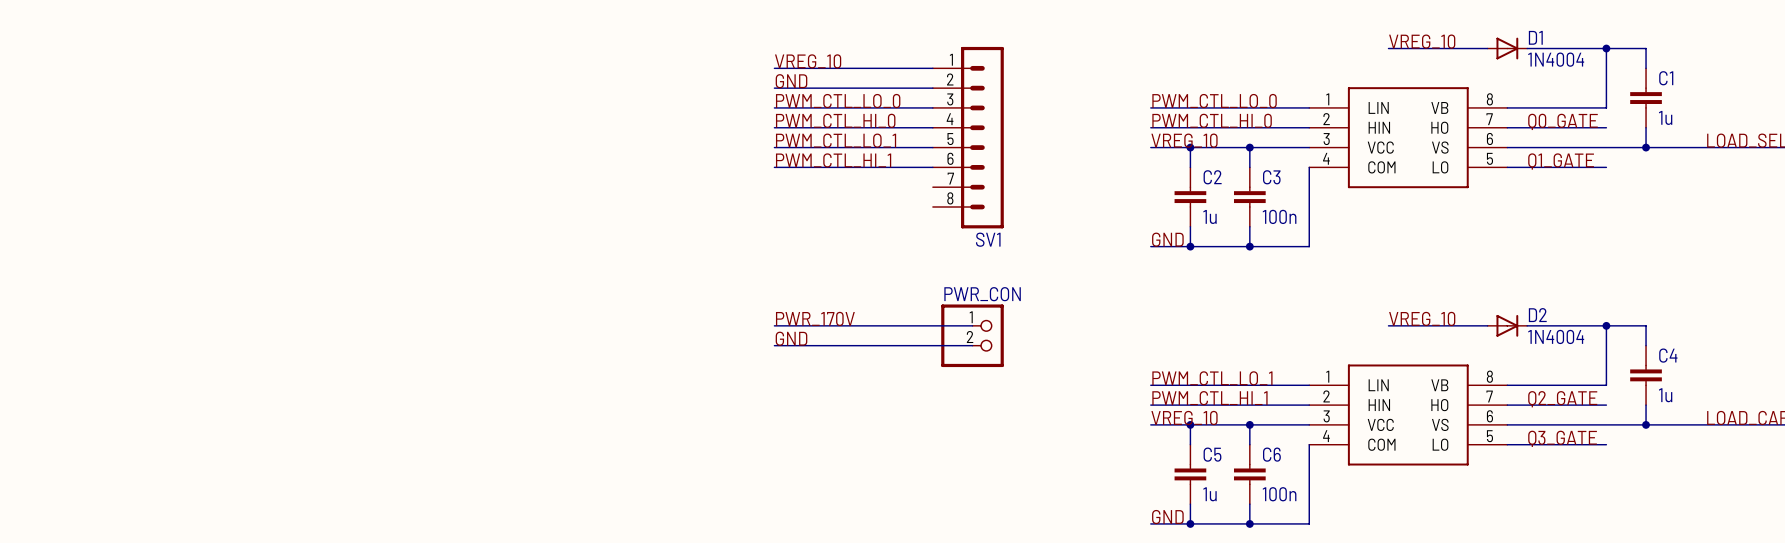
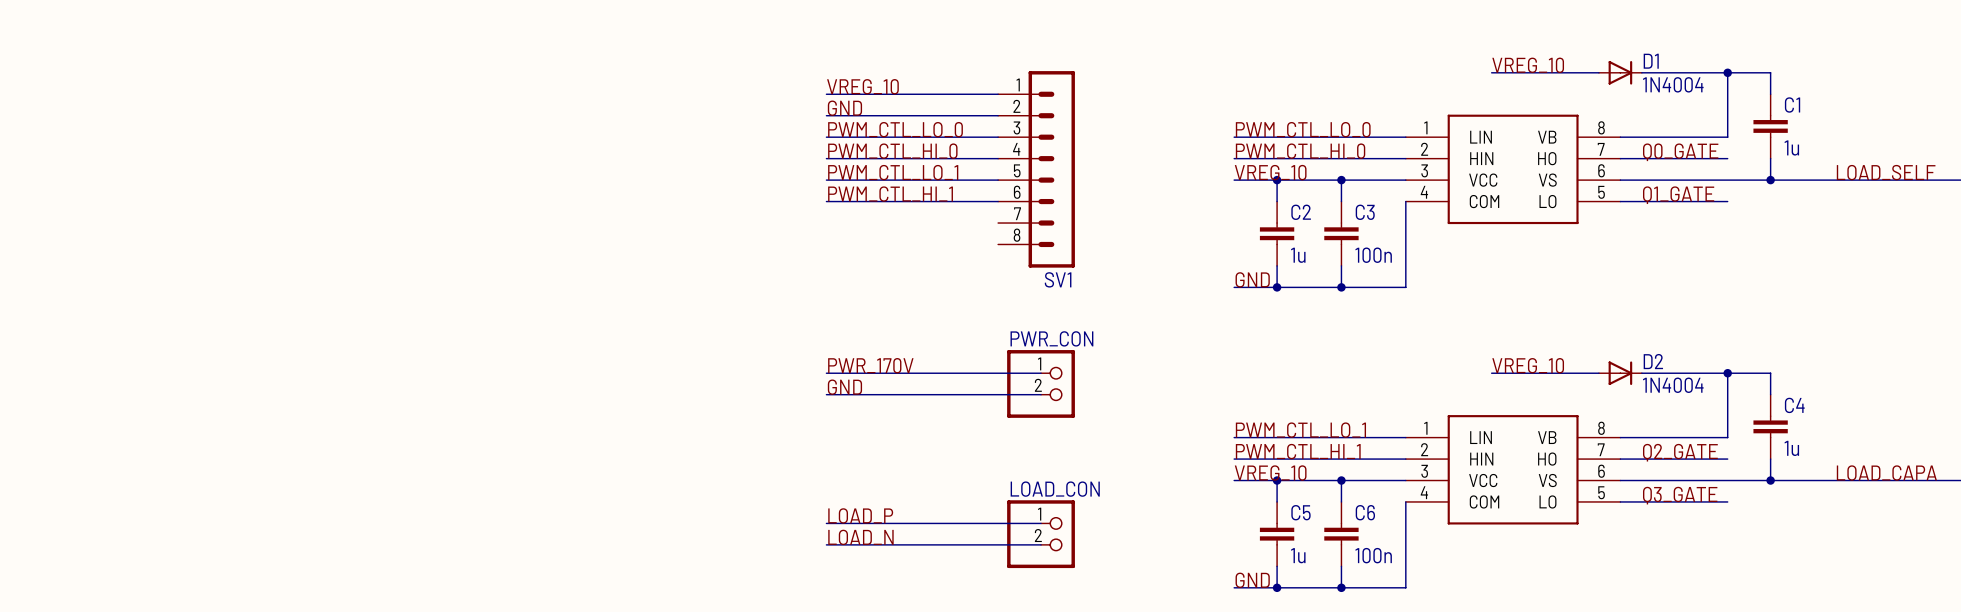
label: none -> LOAD_P (860, 515)
wire: none -> (826, 523) (1041, 523)
LOAD_CON: none -> (1041, 534)
label: none -> LOAD_N (860, 537)
wire: none -> (826, 544) (1041, 544)

